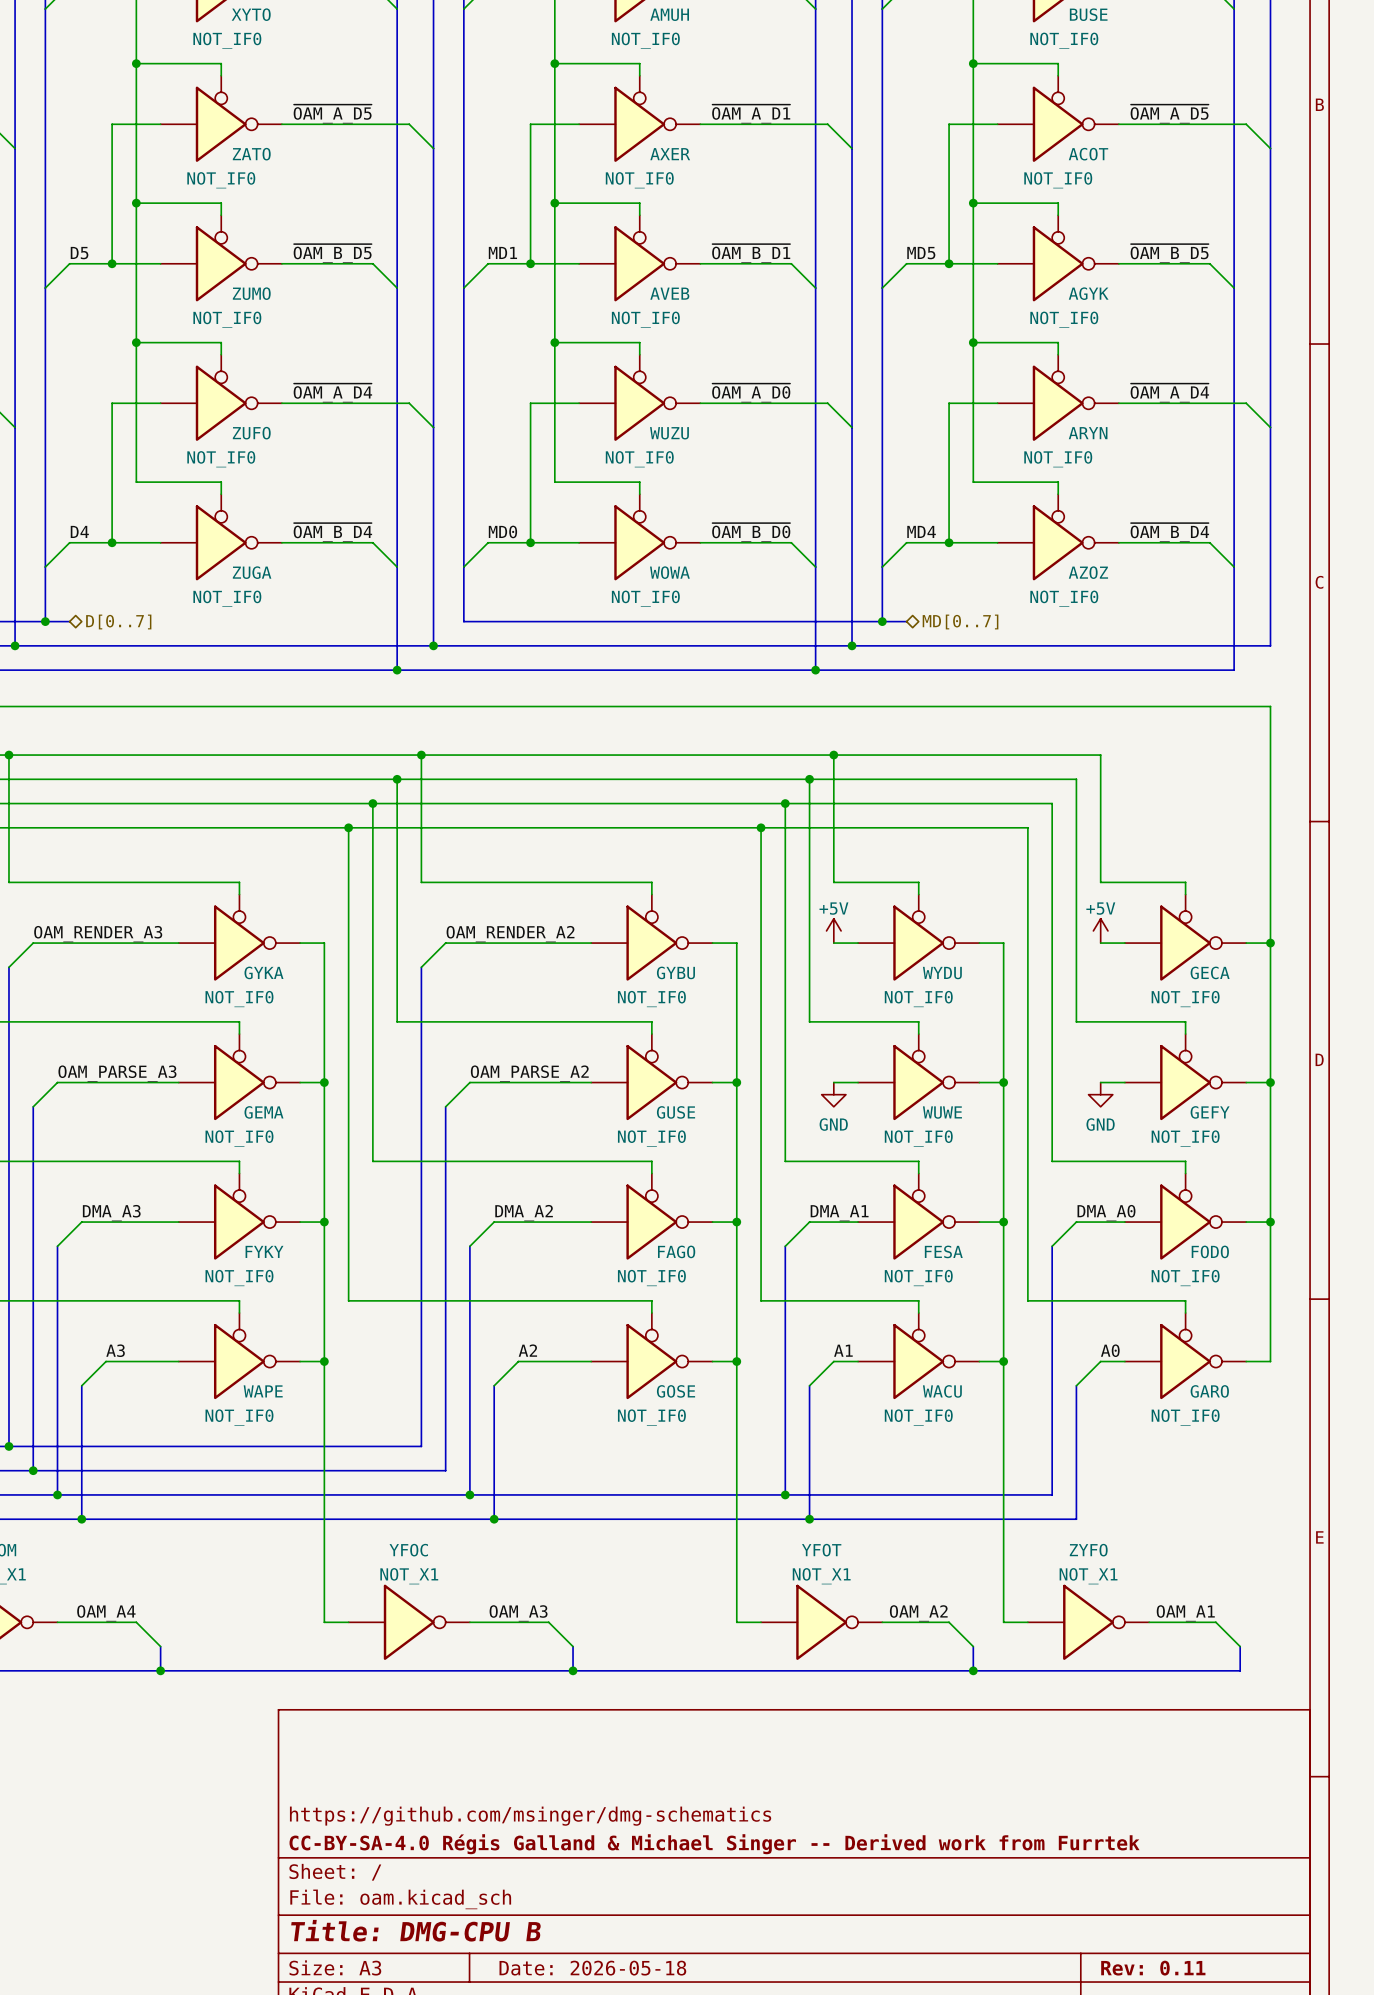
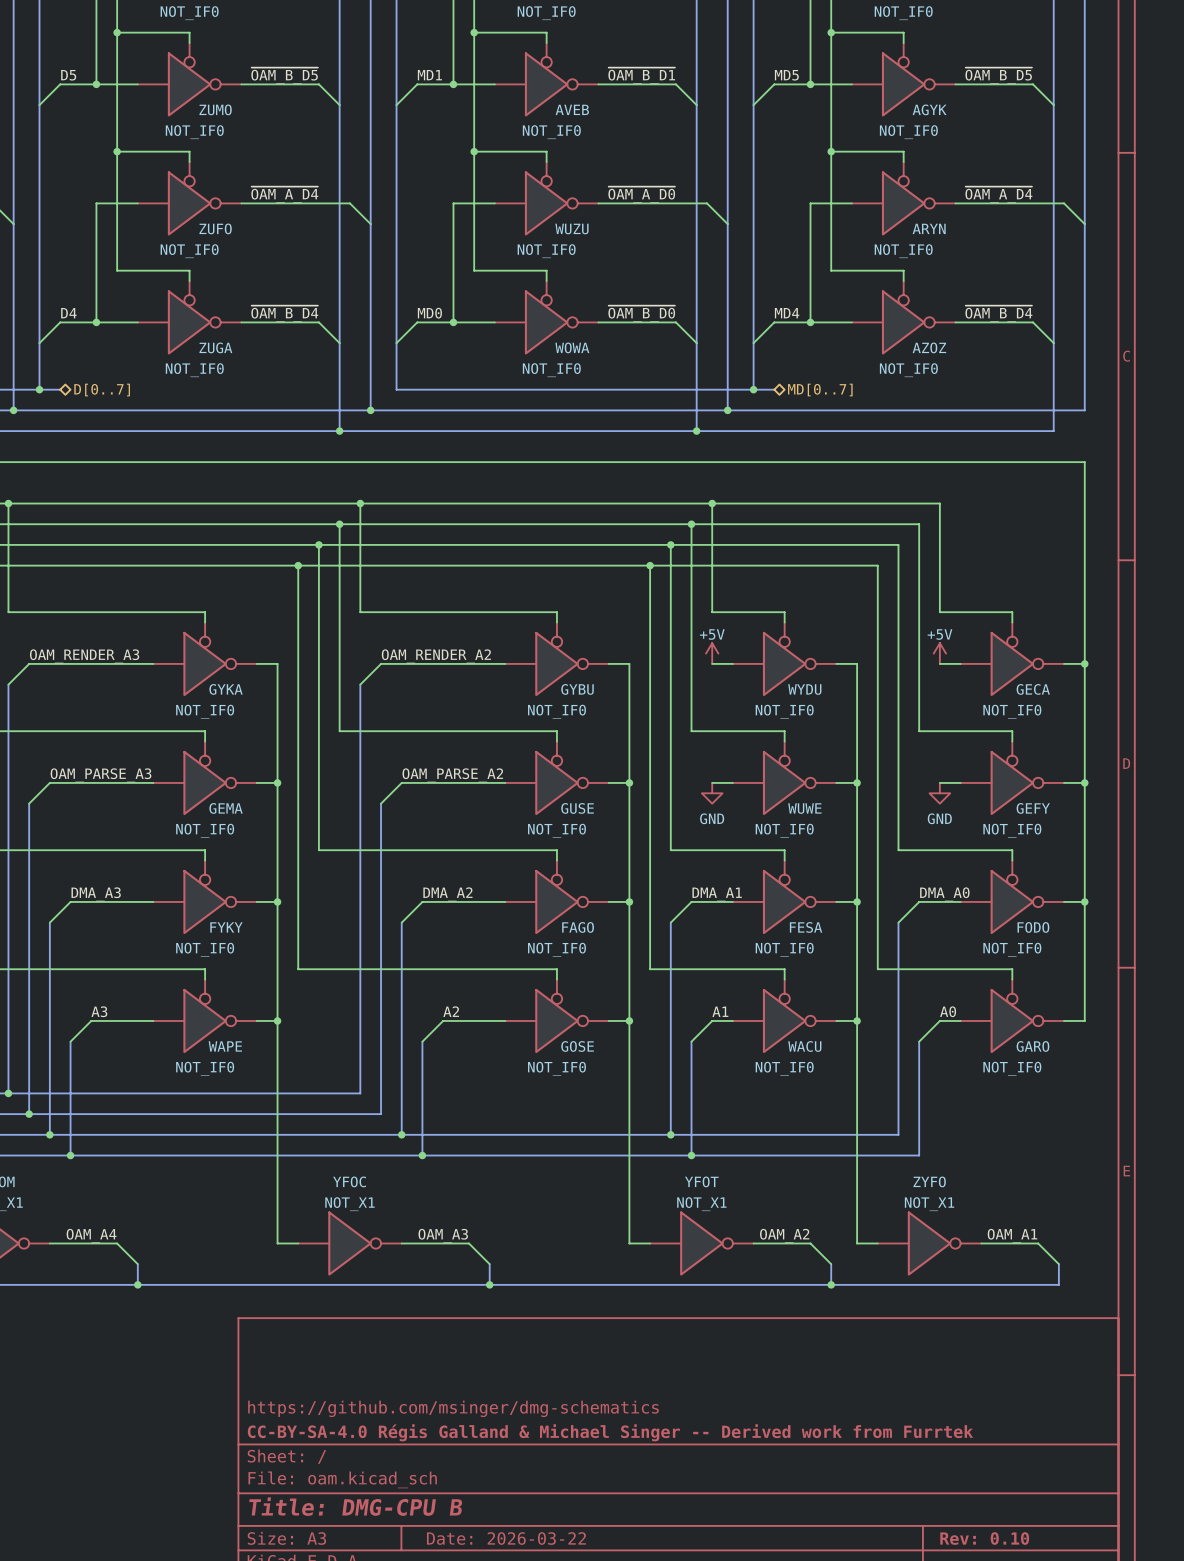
title block: Date: 2026-05-18 (592, 1968) -> Date: 2026-03-22 (506, 1538)
title block: Rev: 0.11 (1153, 1968) -> Rev: 0.10 (984, 1538)

